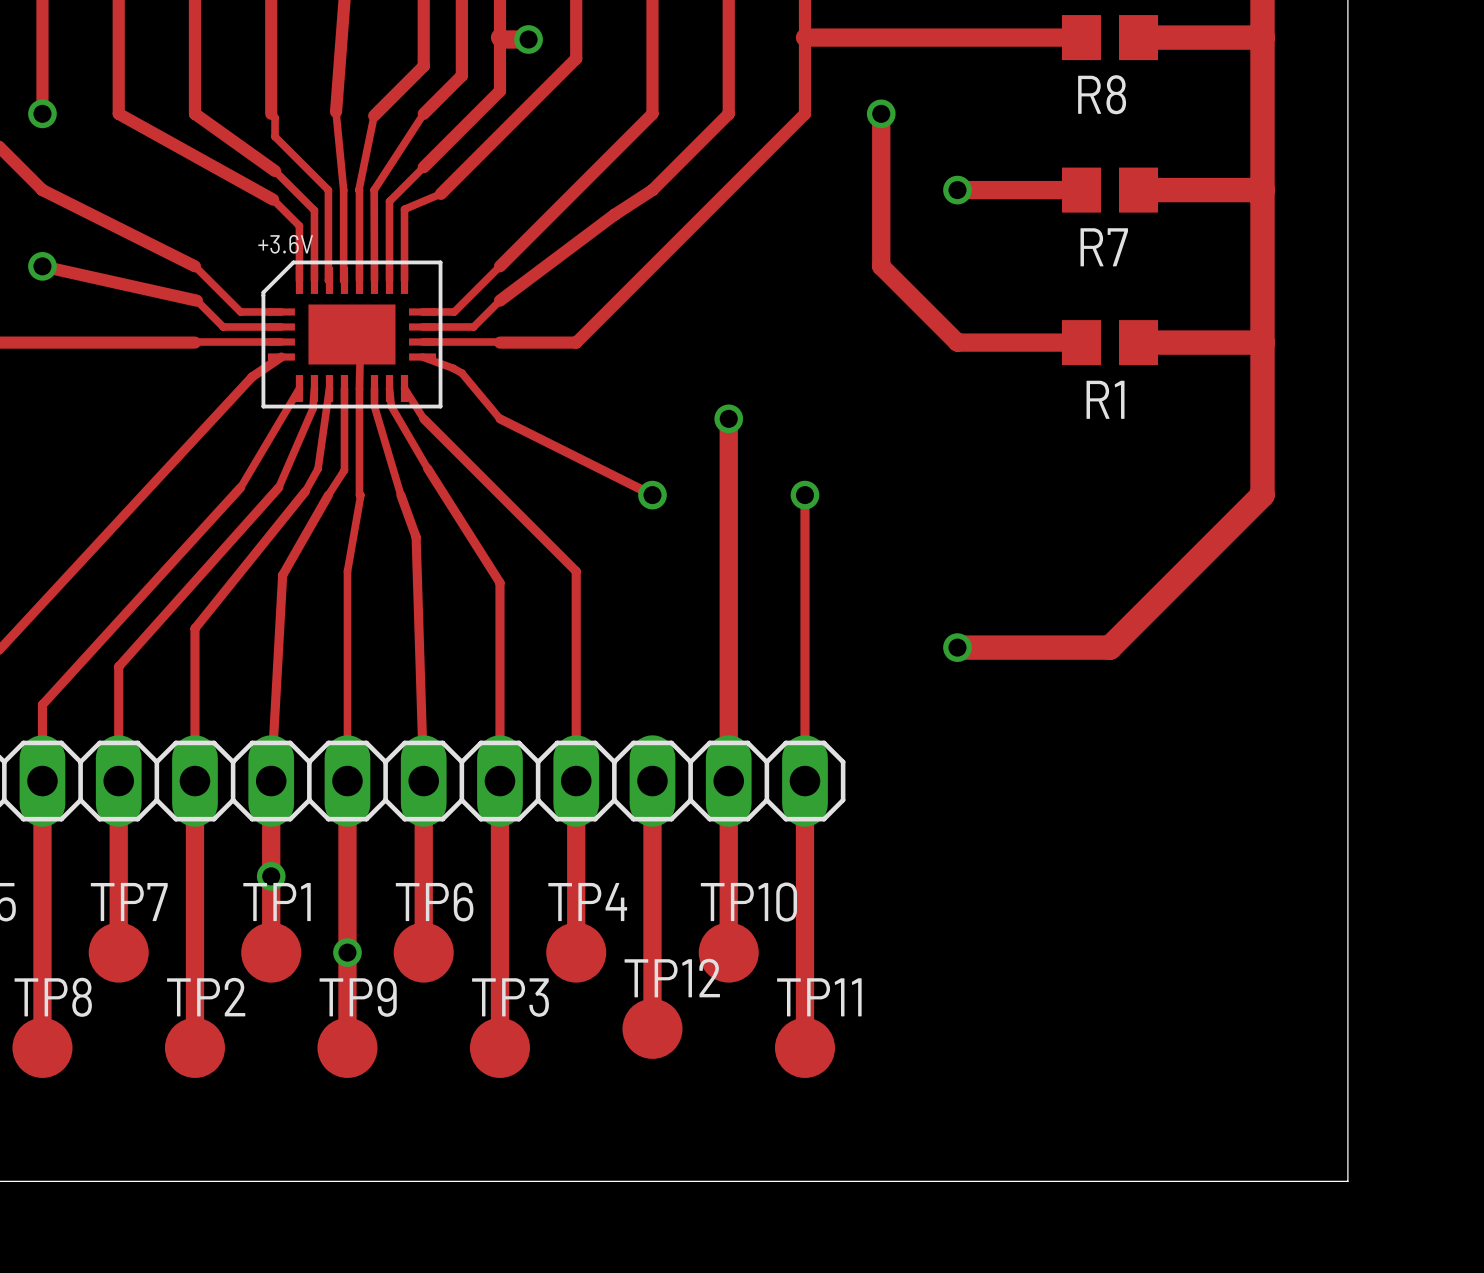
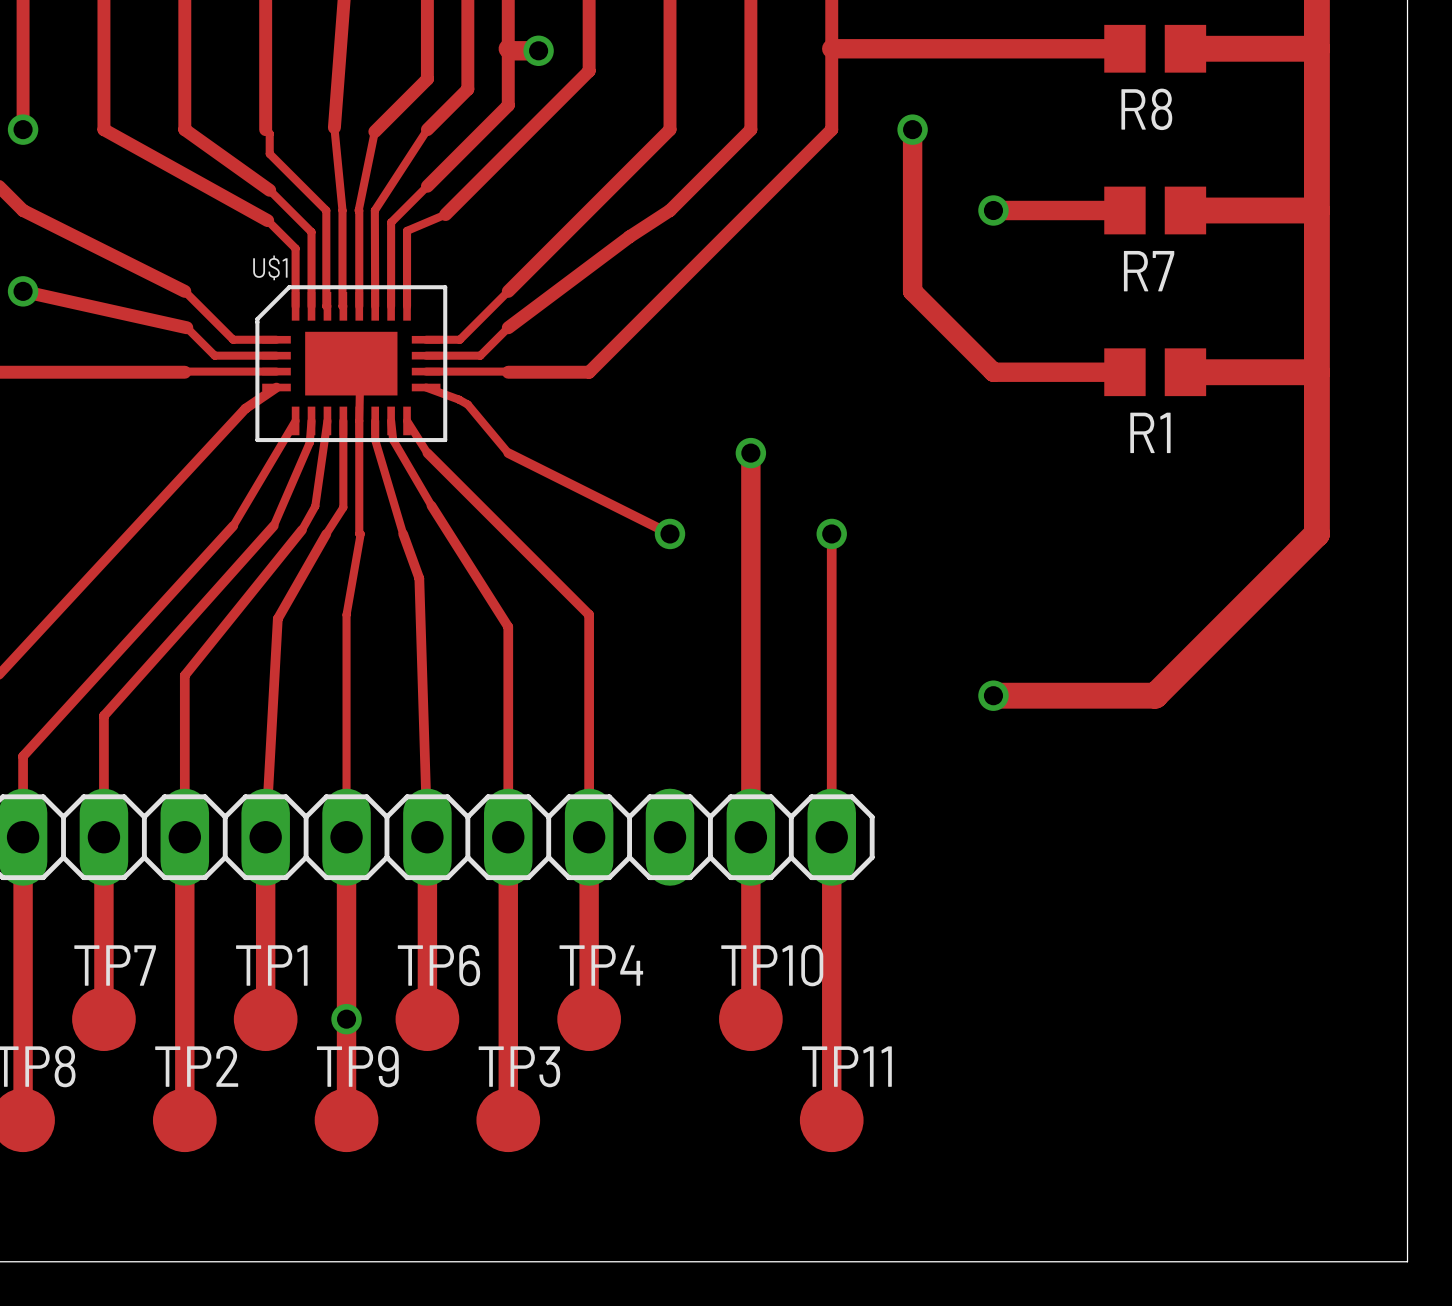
+3.6V name: +3.6V (285, 244) -> U$1 (270, 267)
track: (652, 781) (652, 1028) -> none
via: (271, 876) -> none
TP12: (652, 1028) -> none

